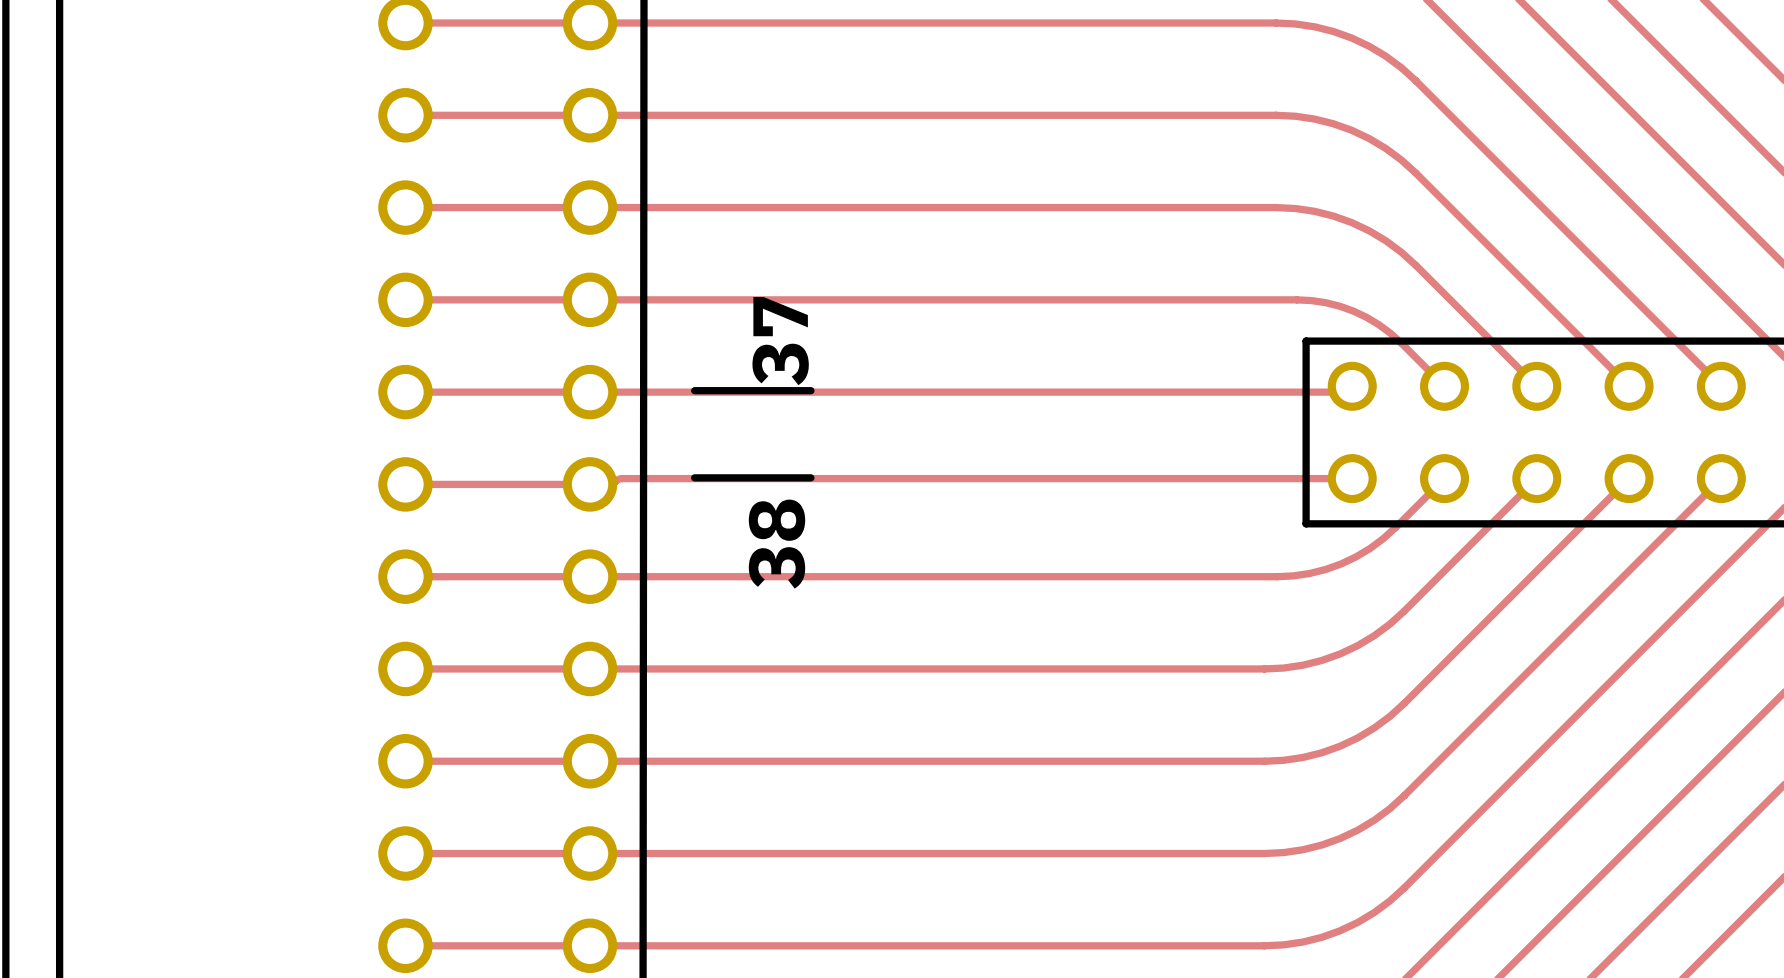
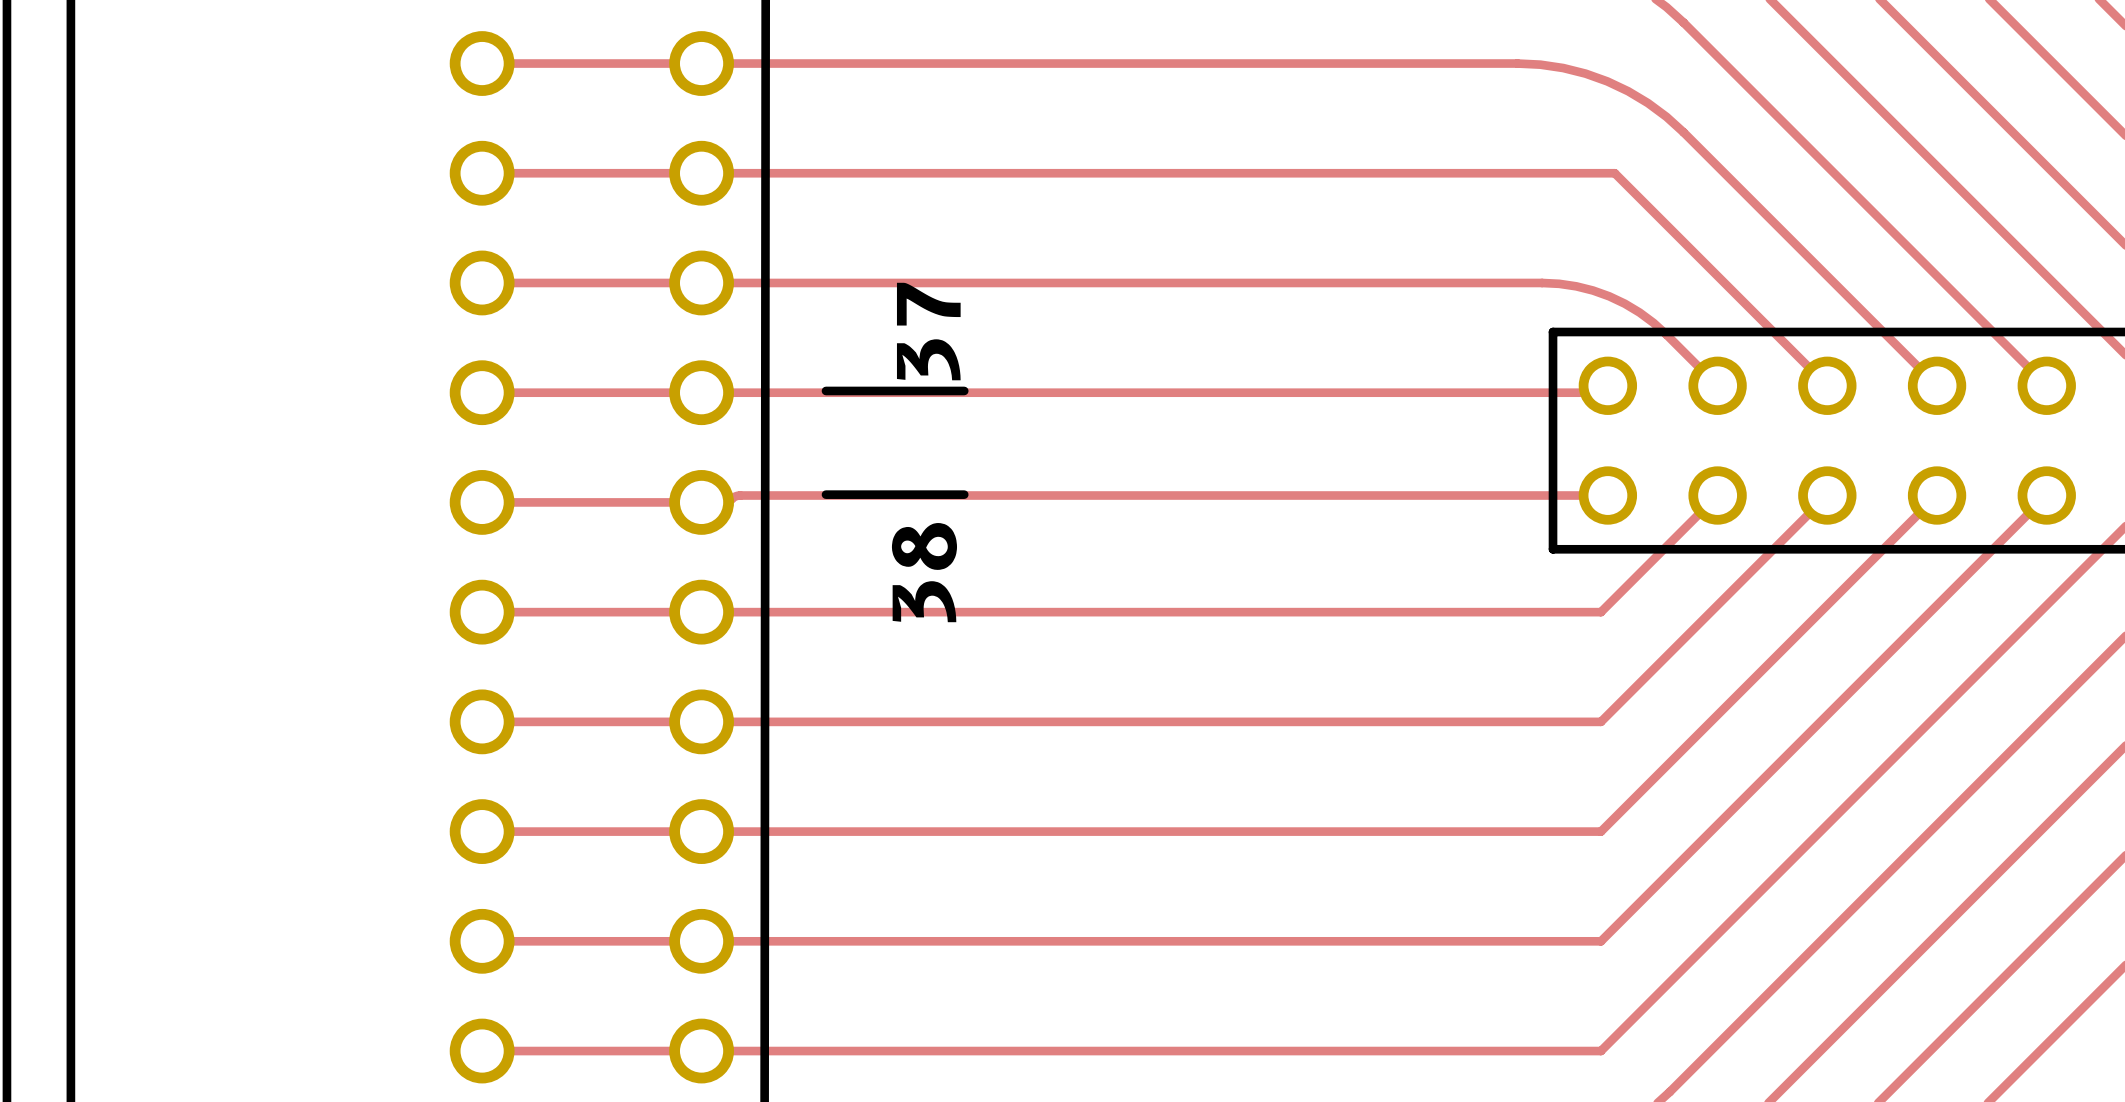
track: (1276, 207) (1314, 211) (1351, 222) (1386, 240) (1415, 265) -> (1517, 173) (1614, 173) (1683, 242)
track: (1395, 527) (1370, 548) (1341, 563) (1309, 573) (1277, 576) -> (1659, 553) (1600, 612) (1518, 612)
track: (1404, 611) (1374, 635) (1340, 653) (1303, 665) (1264, 668) -> (1669, 653) (1600, 721) (1503, 721)
track: (1404, 703) (1374, 727) (1340, 746) (1303, 757) (1264, 761) -> (1669, 762) (1600, 831) (1503, 831)
track: (1404, 795) (1374, 820) (1340, 838) (1303, 849) (1264, 853) -> (1669, 872) (1600, 941) (1503, 941)
track: (1404, 887) (1374, 912) (1340, 930) (1303, 942) (1264, 945) -> (1669, 982) (1600, 1051) (1503, 1051)

